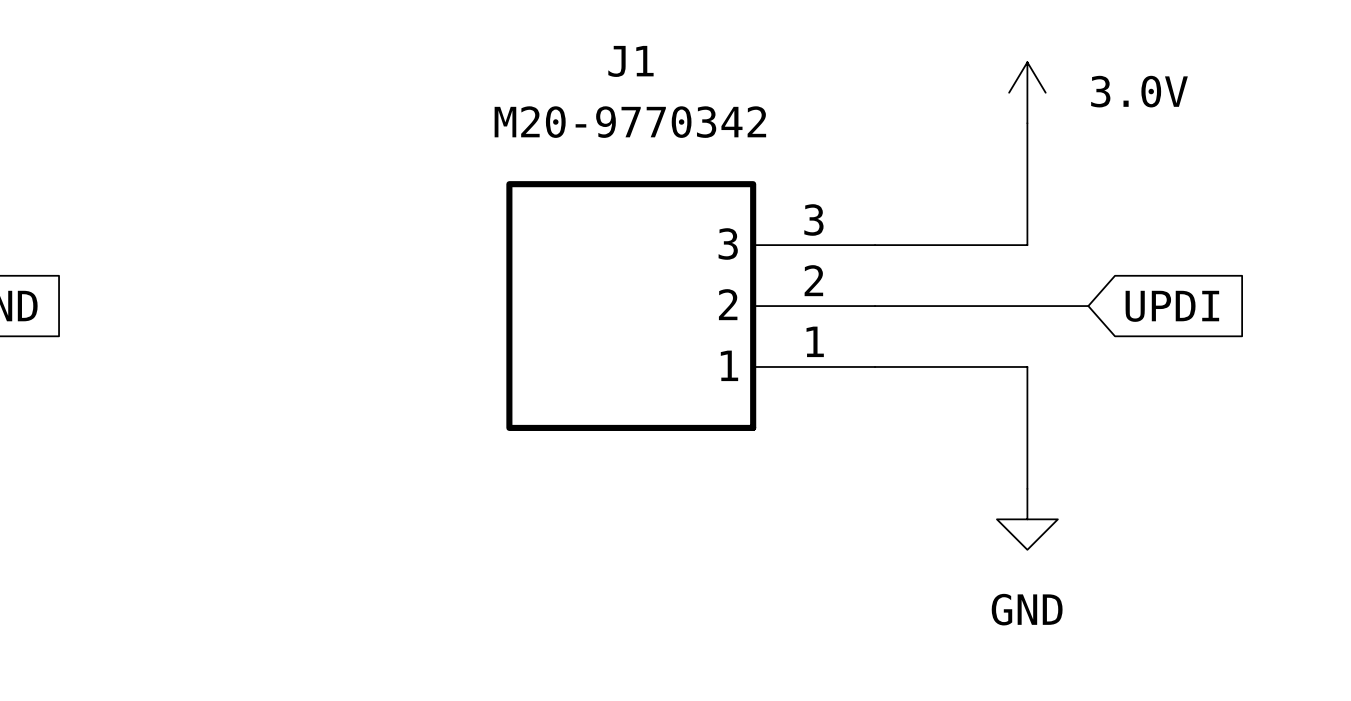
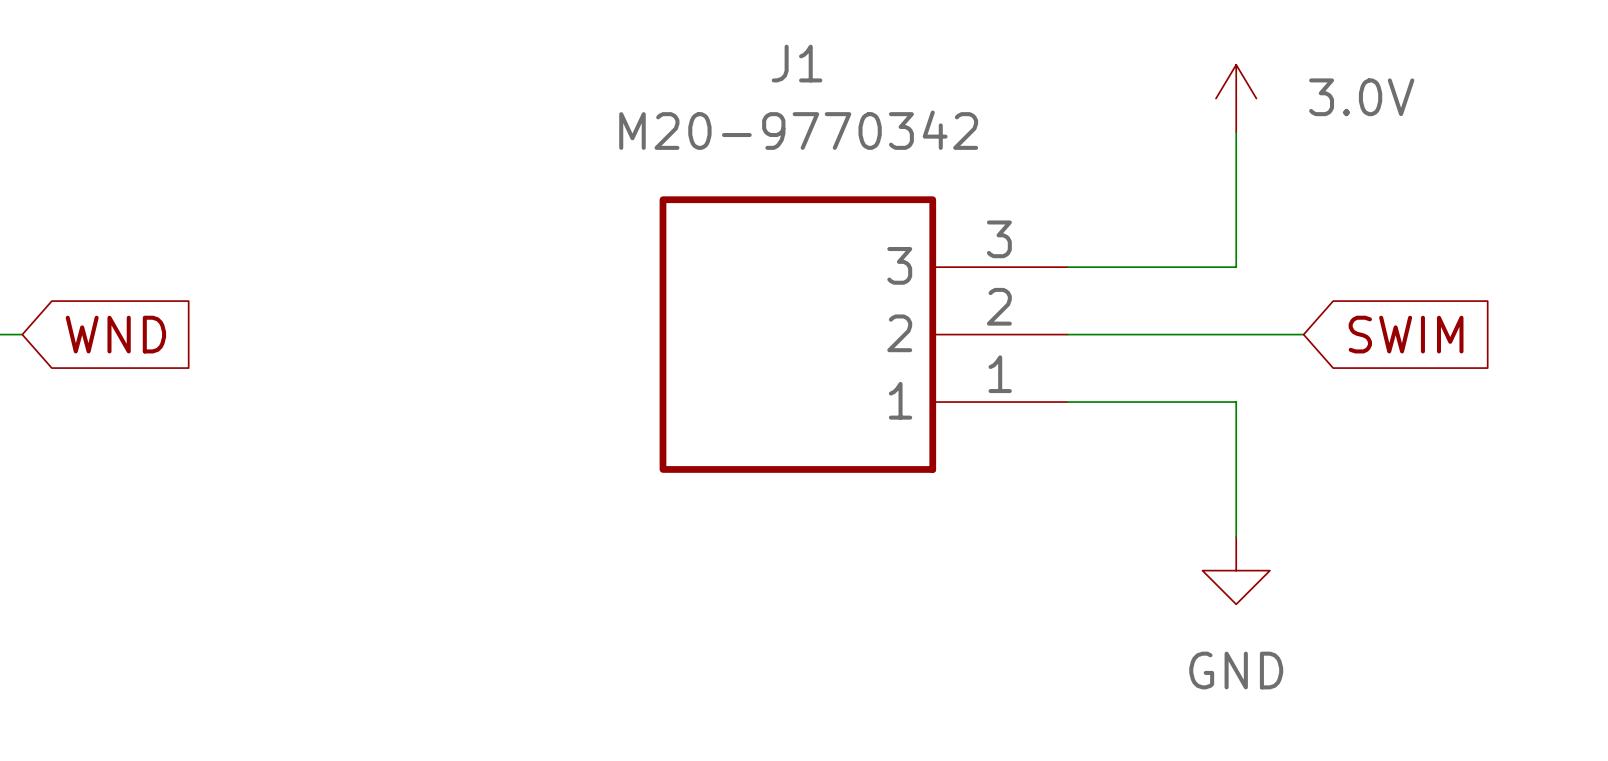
global label: UPDI (1172, 306) -> SWIM (1406, 334)

